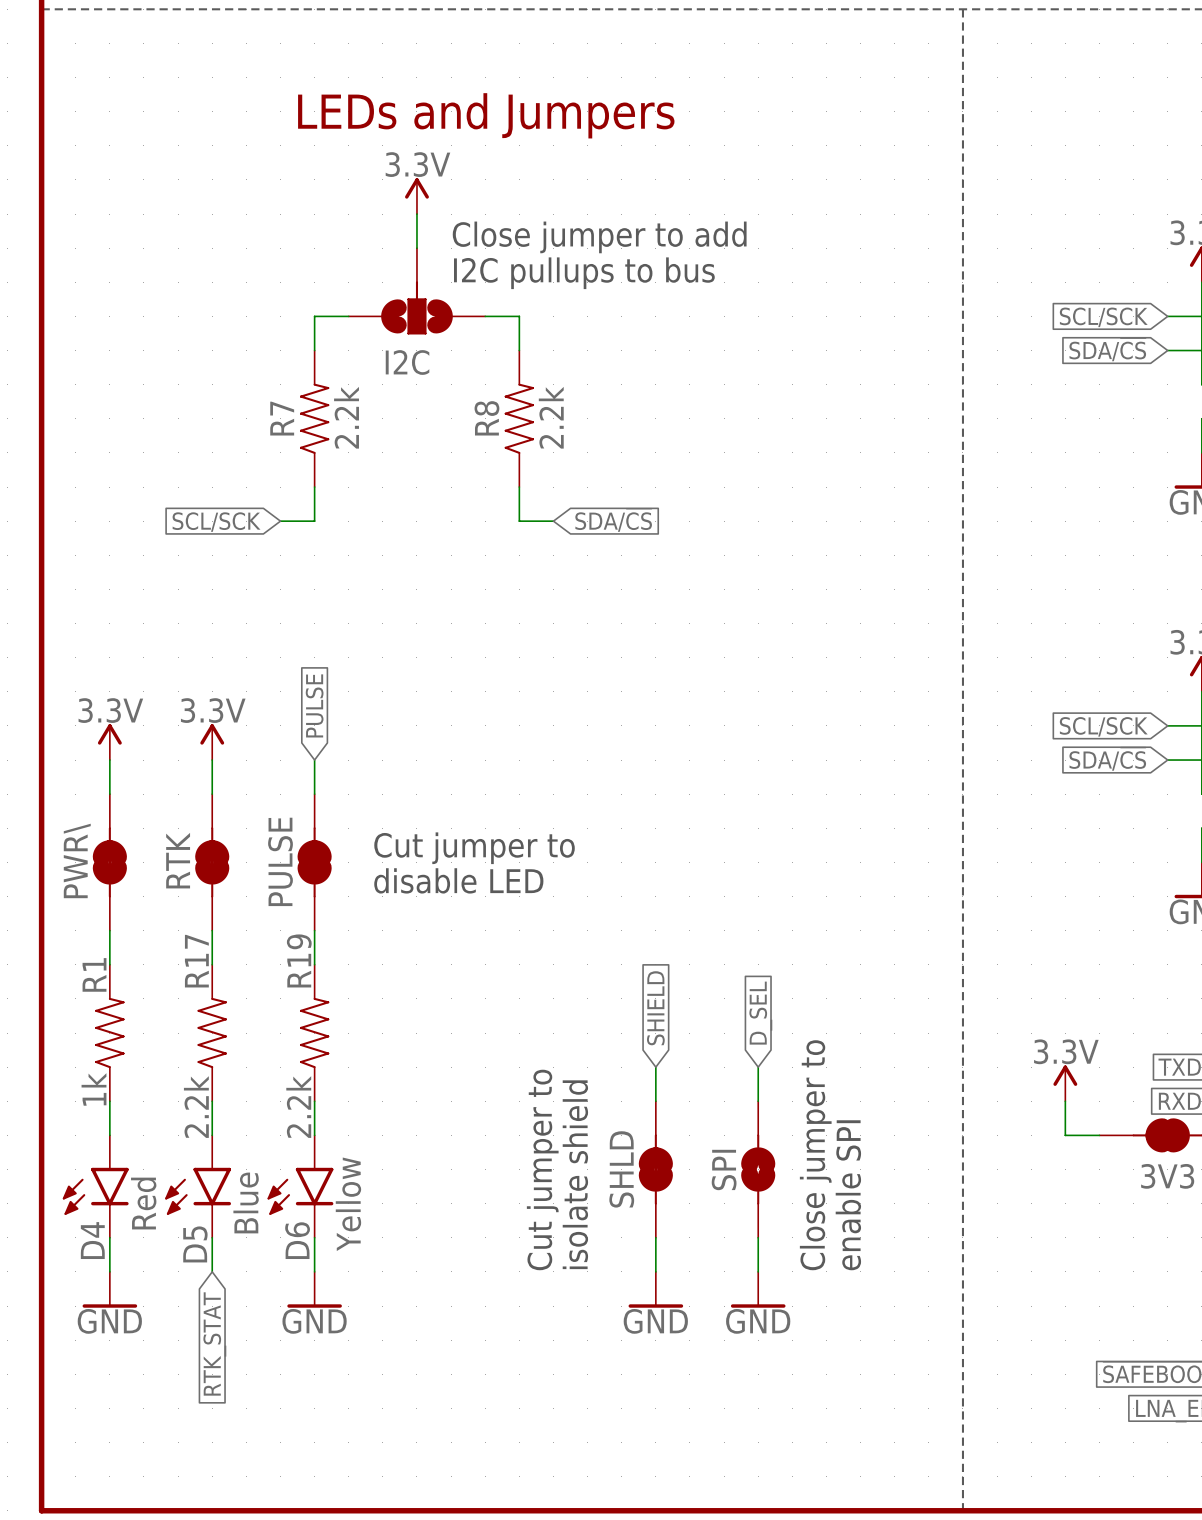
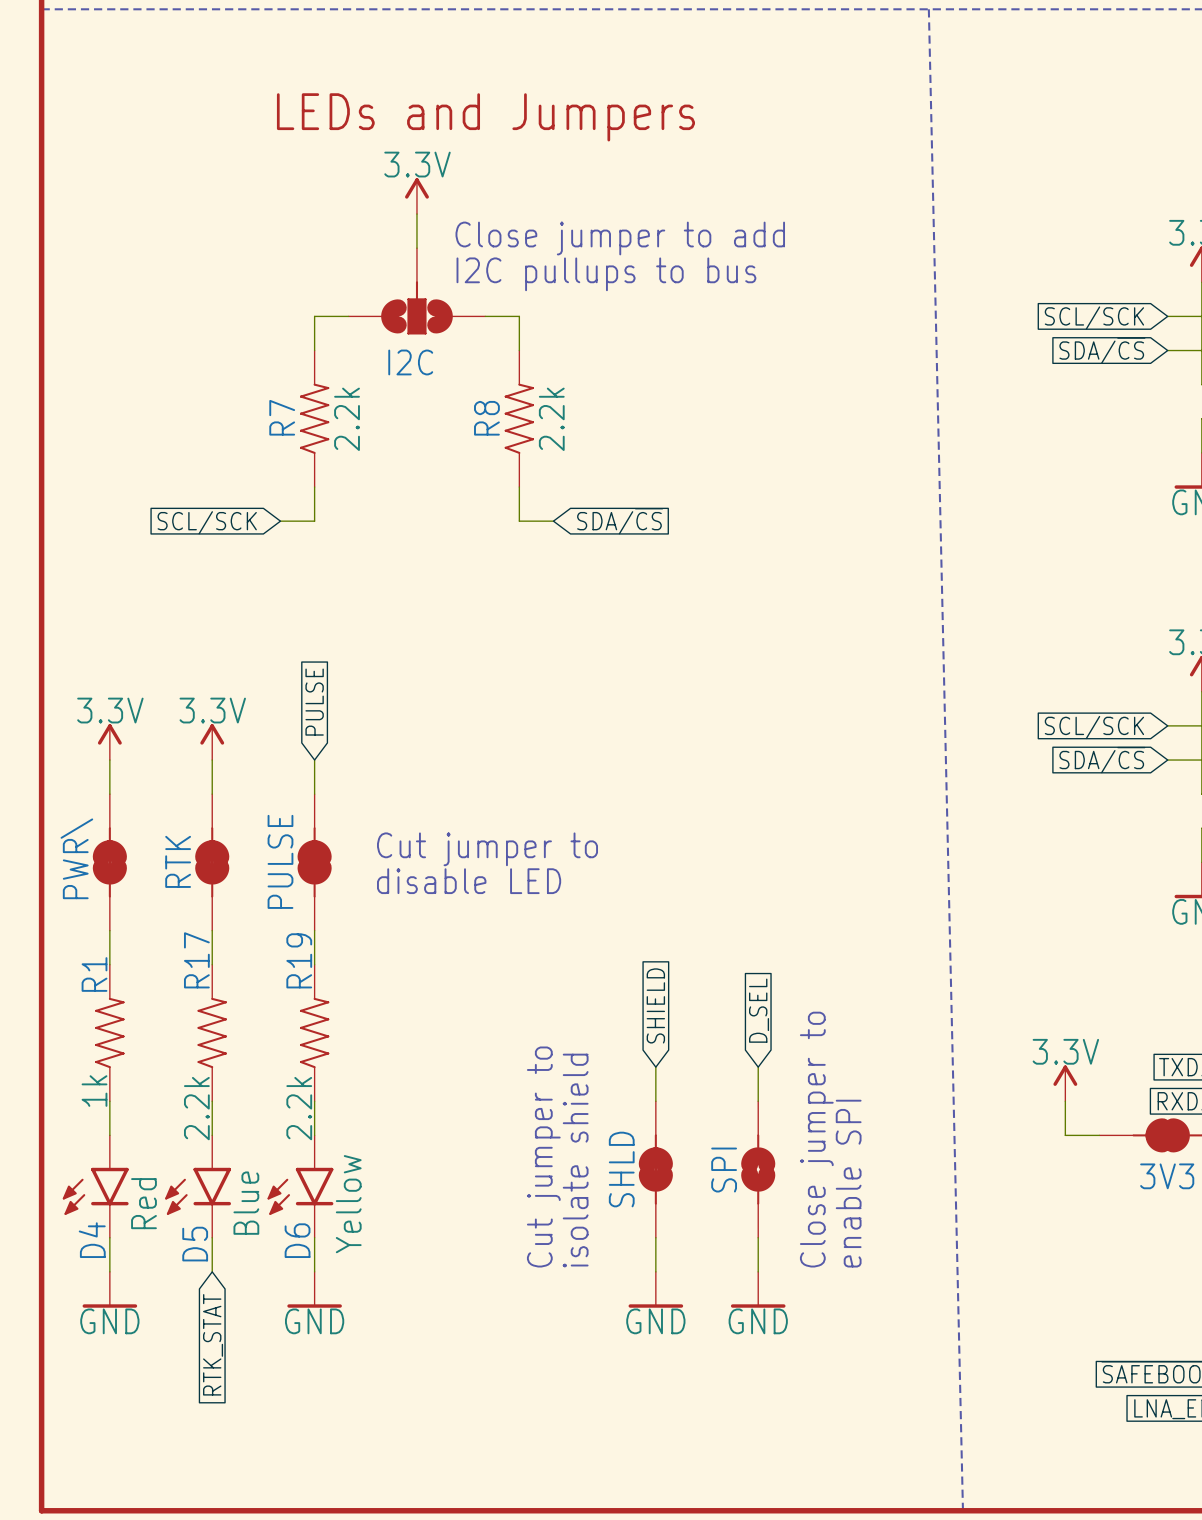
line: (962, 9) (962, 1510) -> (928, 9) (962, 1510)

